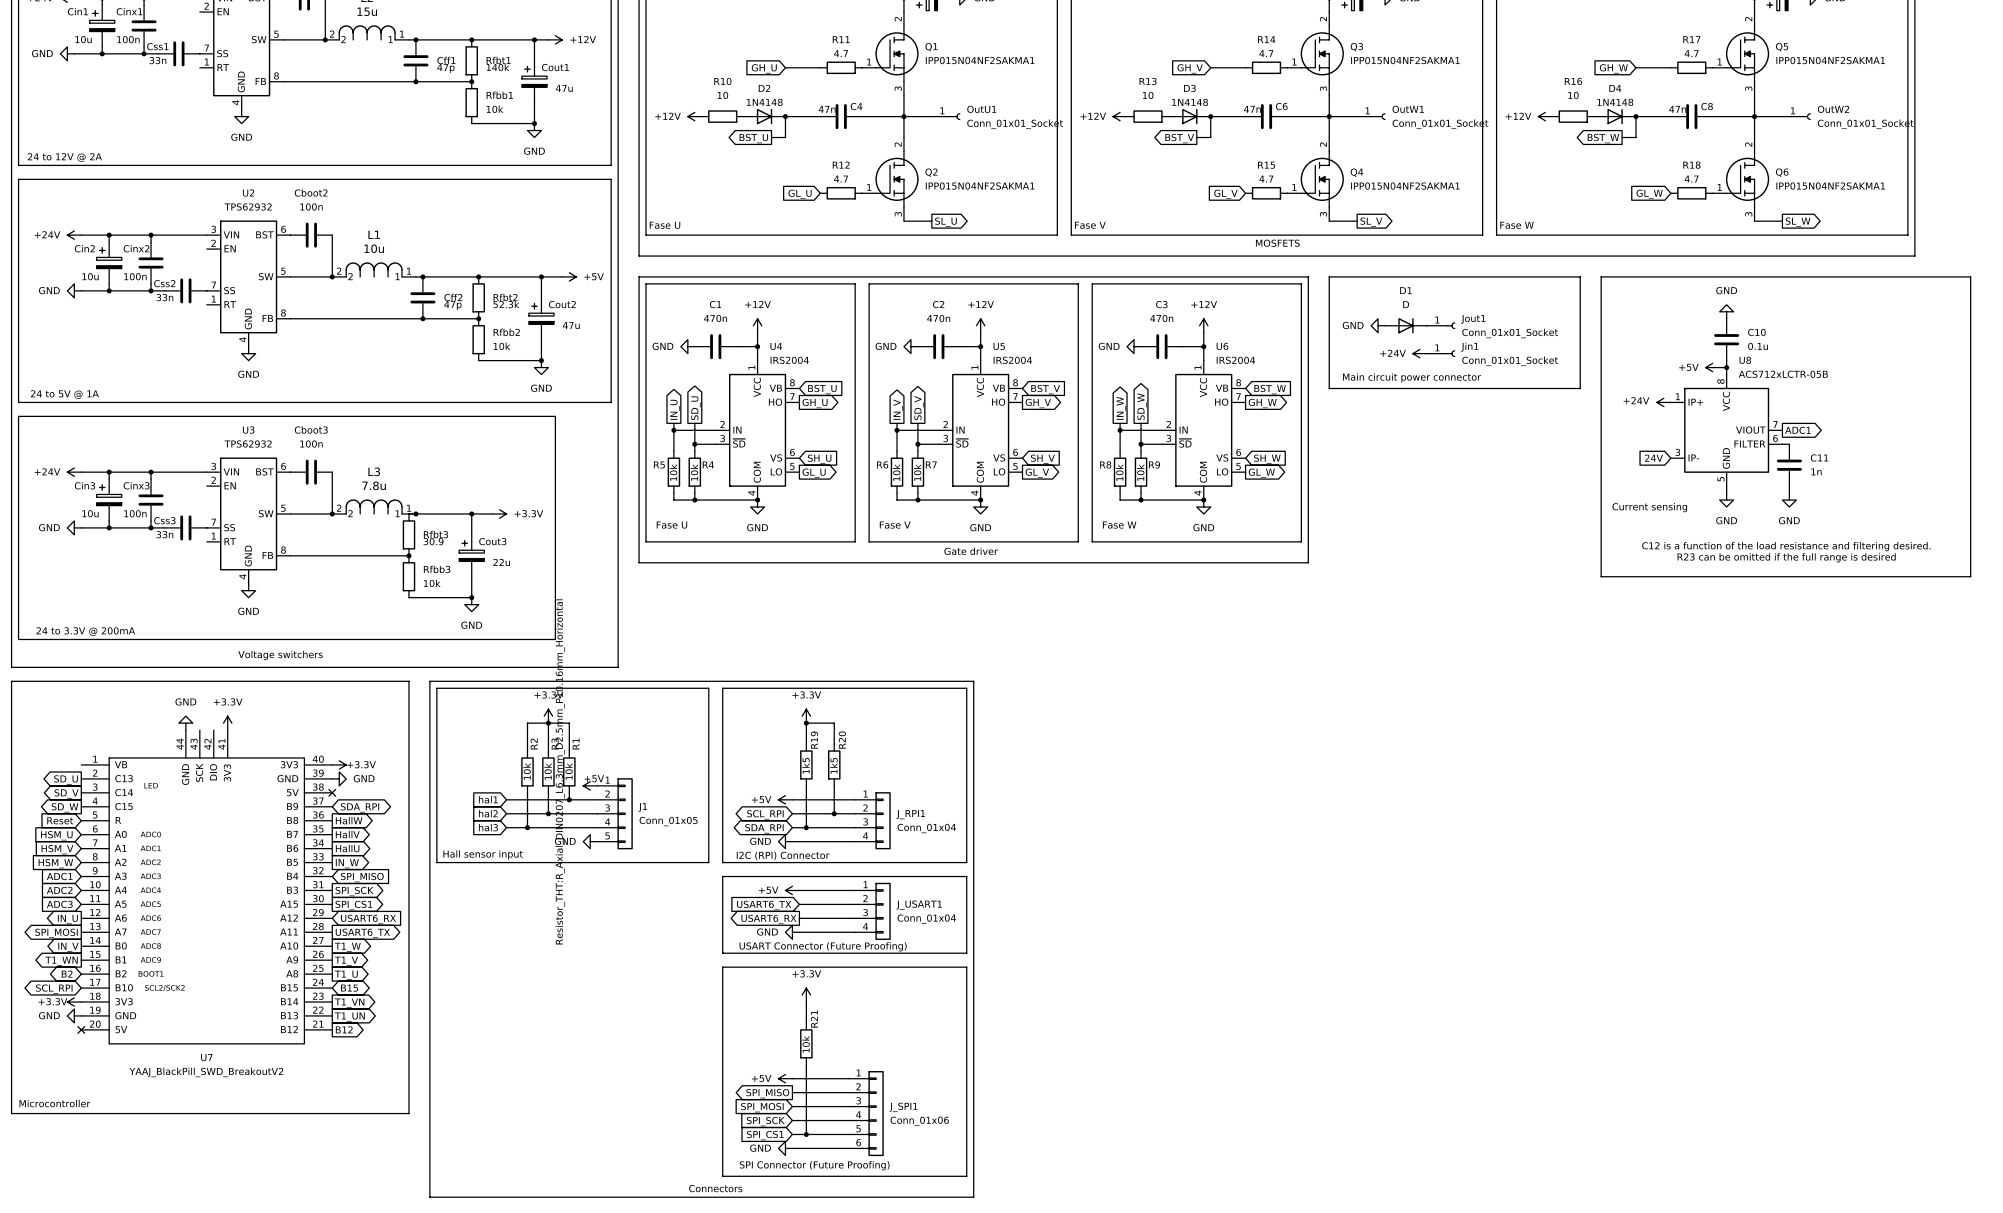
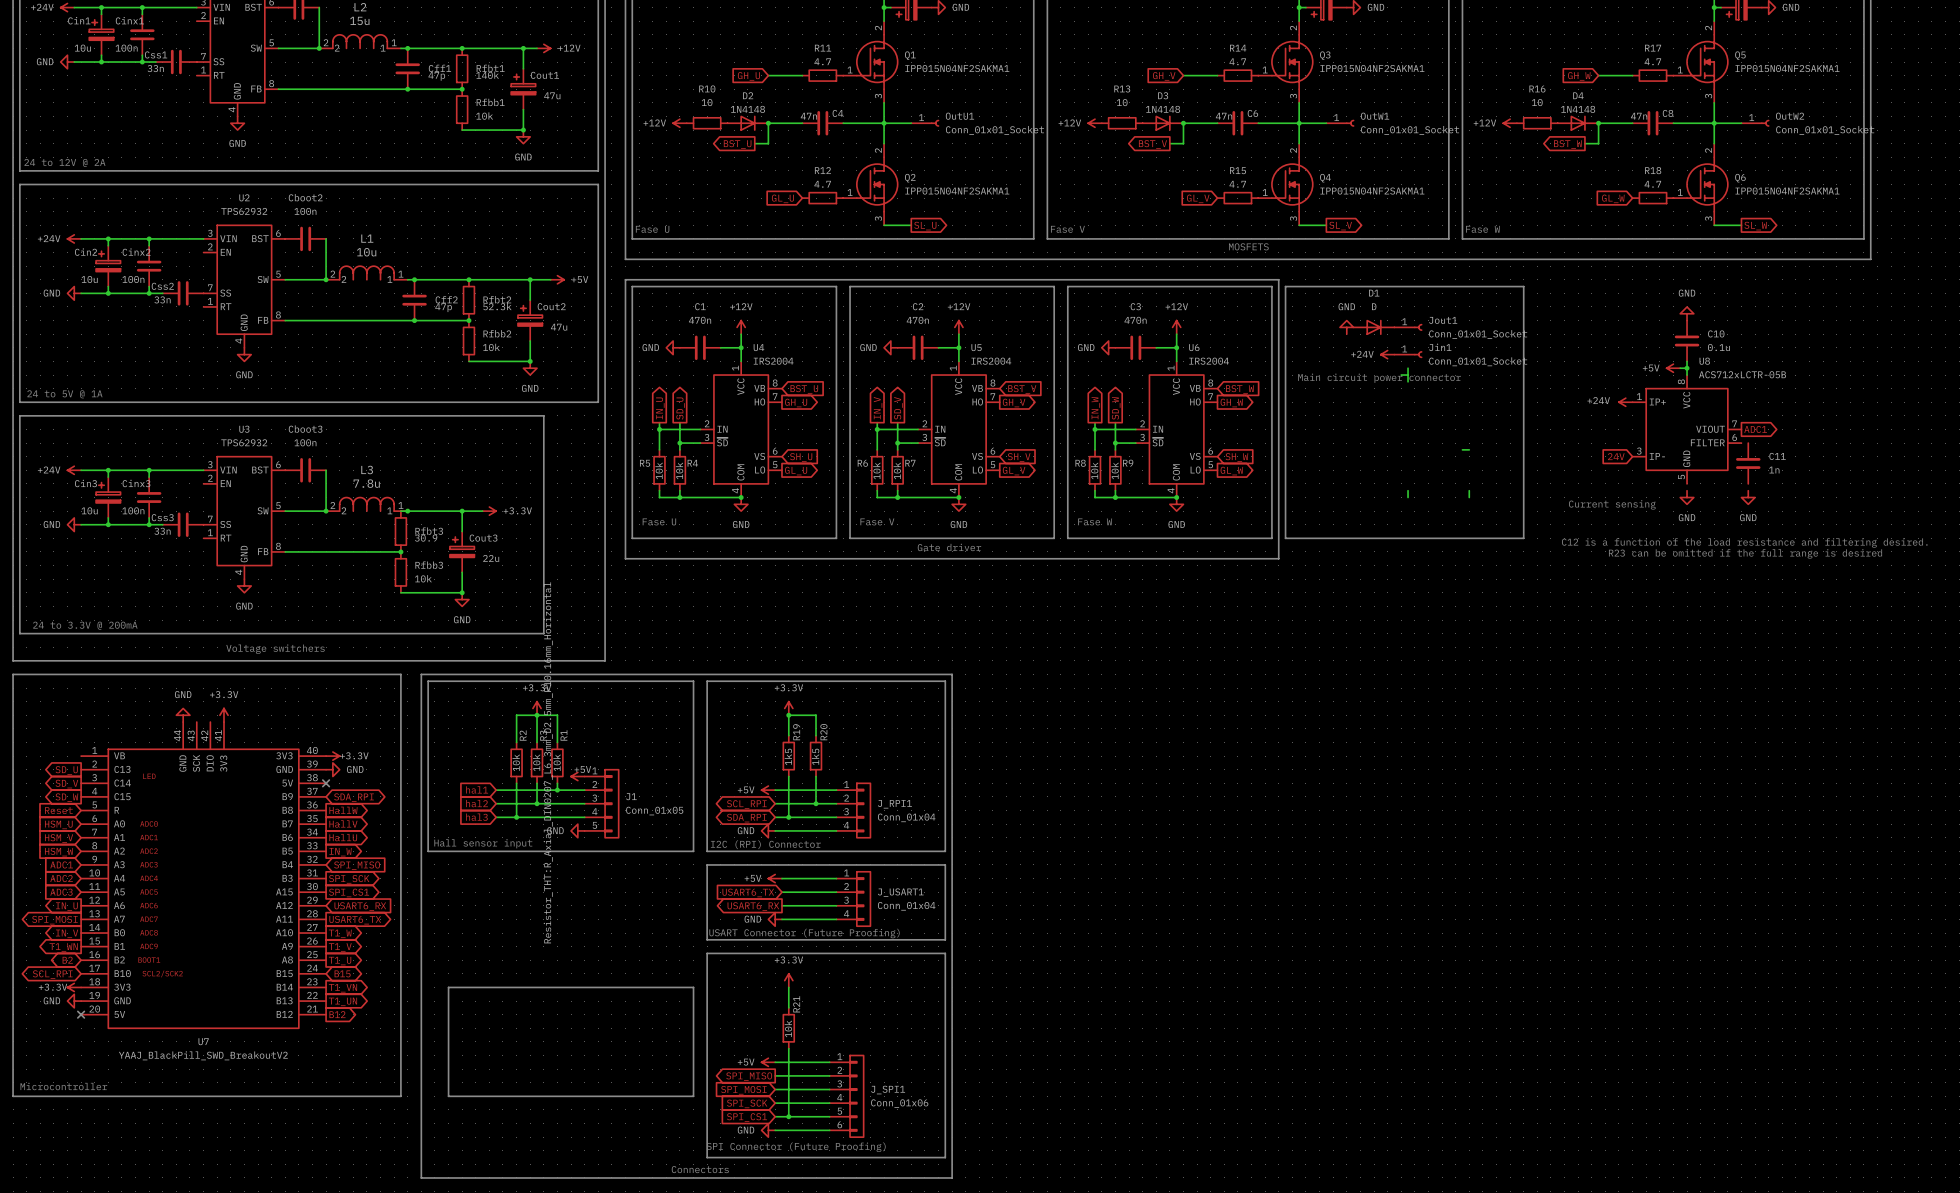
line: (1329, 276) (1580, 276) (1580, 388) (1329, 388) (1329, 276) -> none
line: (1601, 276) (1970, 276) (1970, 576) (1601, 576) (1601, 276) -> none
line: none -> (1285, 286) (1523, 286) (1523, 538) (1285, 538) (1285, 286)
power symbol rotation: 0° (1378, 325) -> 90° clockwise (1346, 327)
wire: none -> (1408, 368) (1408, 381)
wire: none -> (1401, 375) (1408, 375)
wire: (1782, 444) (1789, 444) -> none
wire: none -> (1462, 449) (1469, 449)
wire: (1726, 486) (1726, 493) -> none
wire: (1789, 486) (1789, 493) -> none
wire: none -> (1408, 490) (1408, 497)
wire: none -> (1469, 490) (1469, 497)
line: none -> (448, 987) (693, 987) (693, 1096) (448, 1096) (448, 987)

